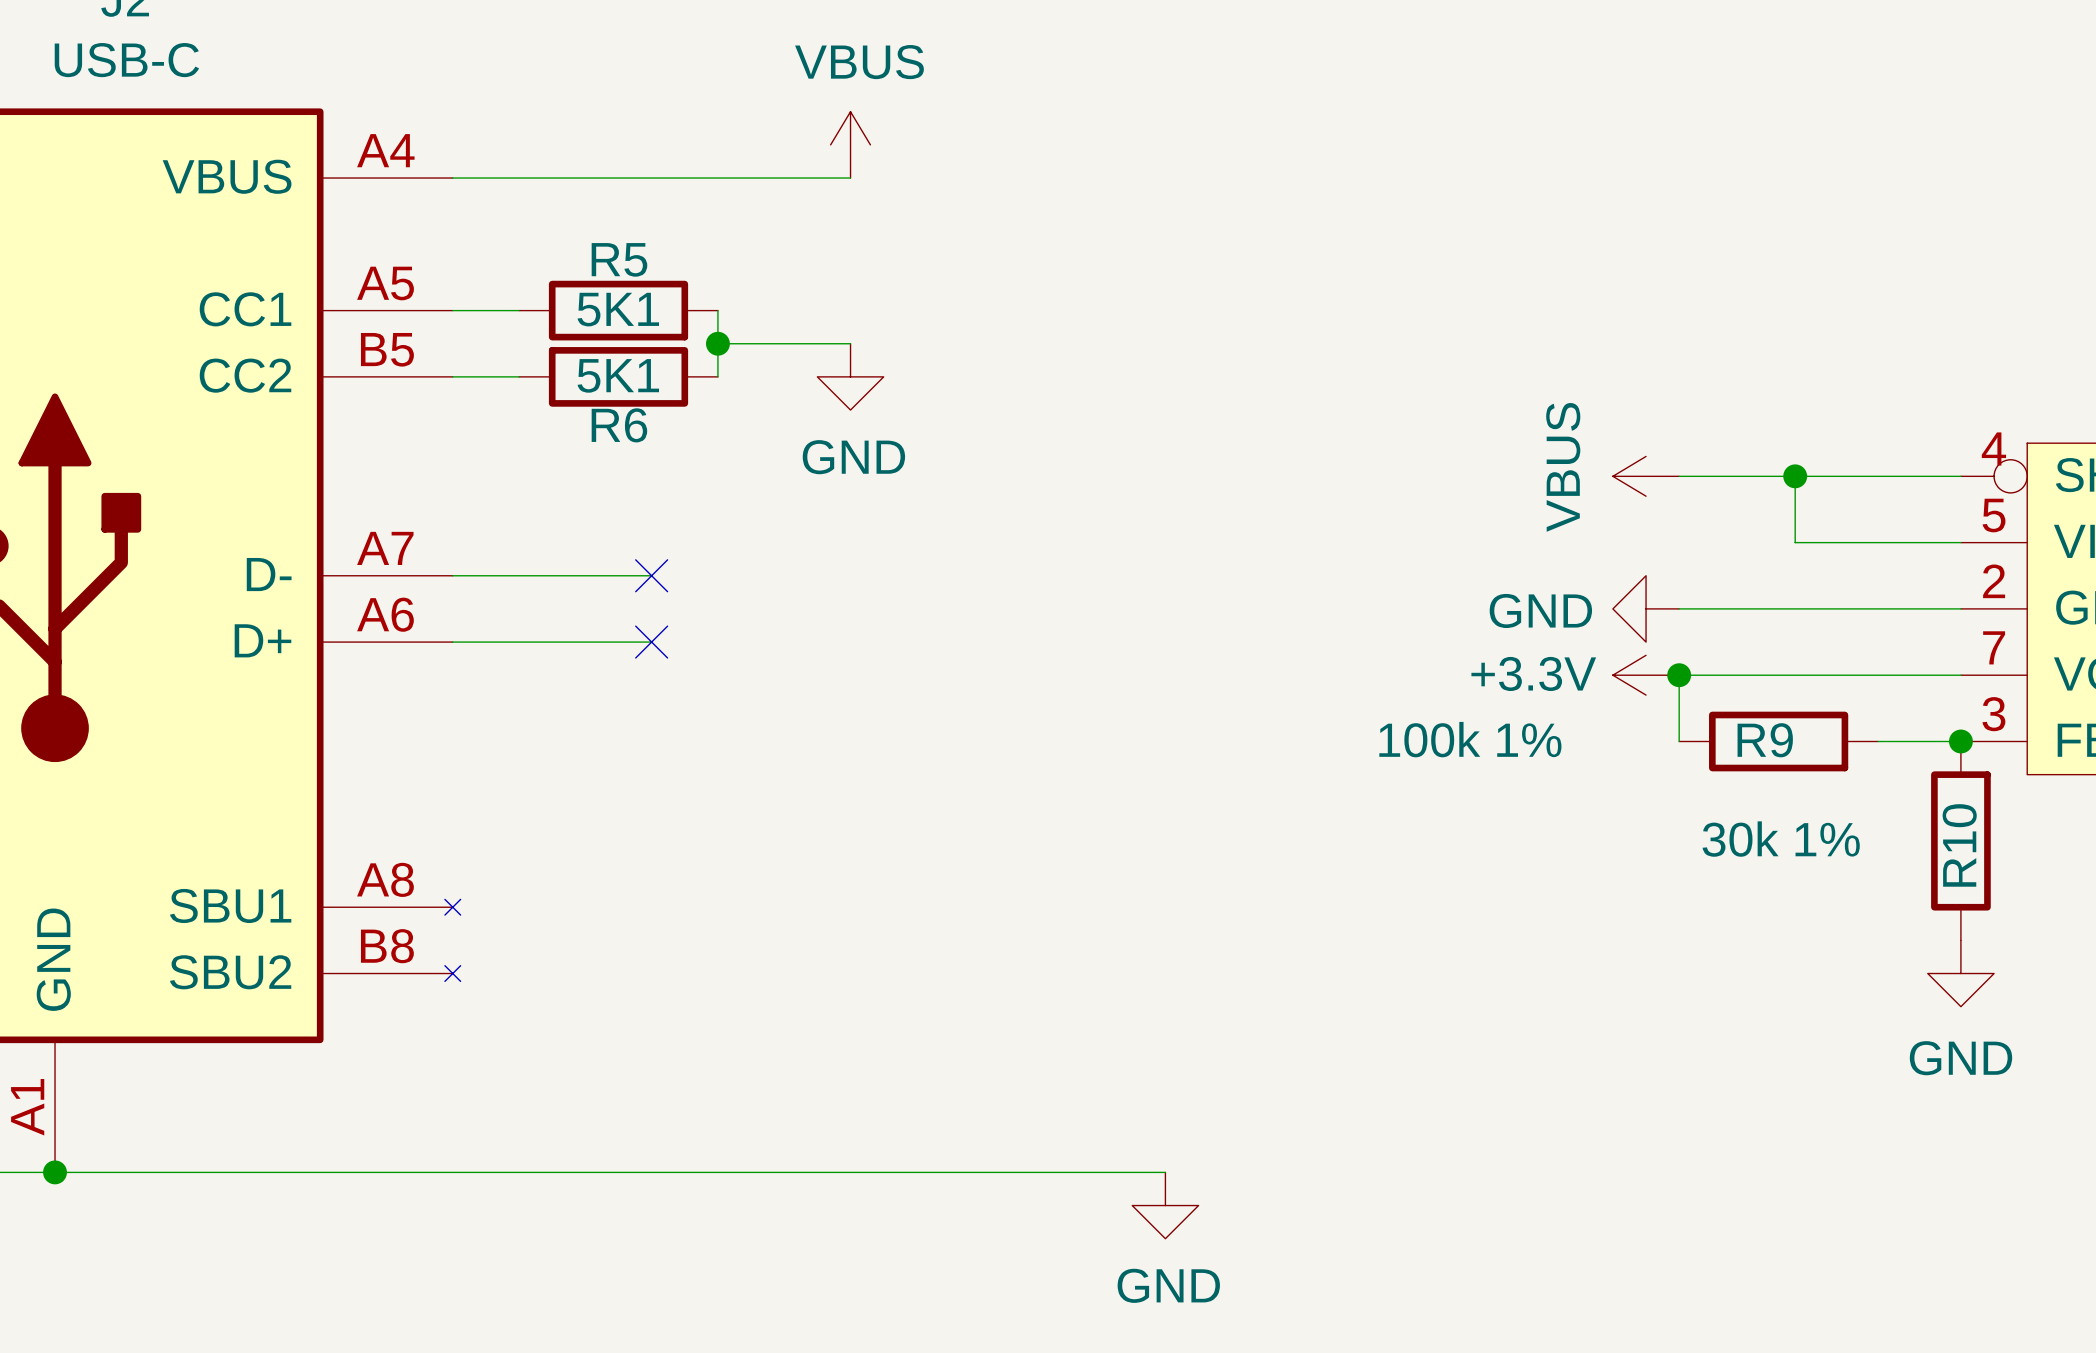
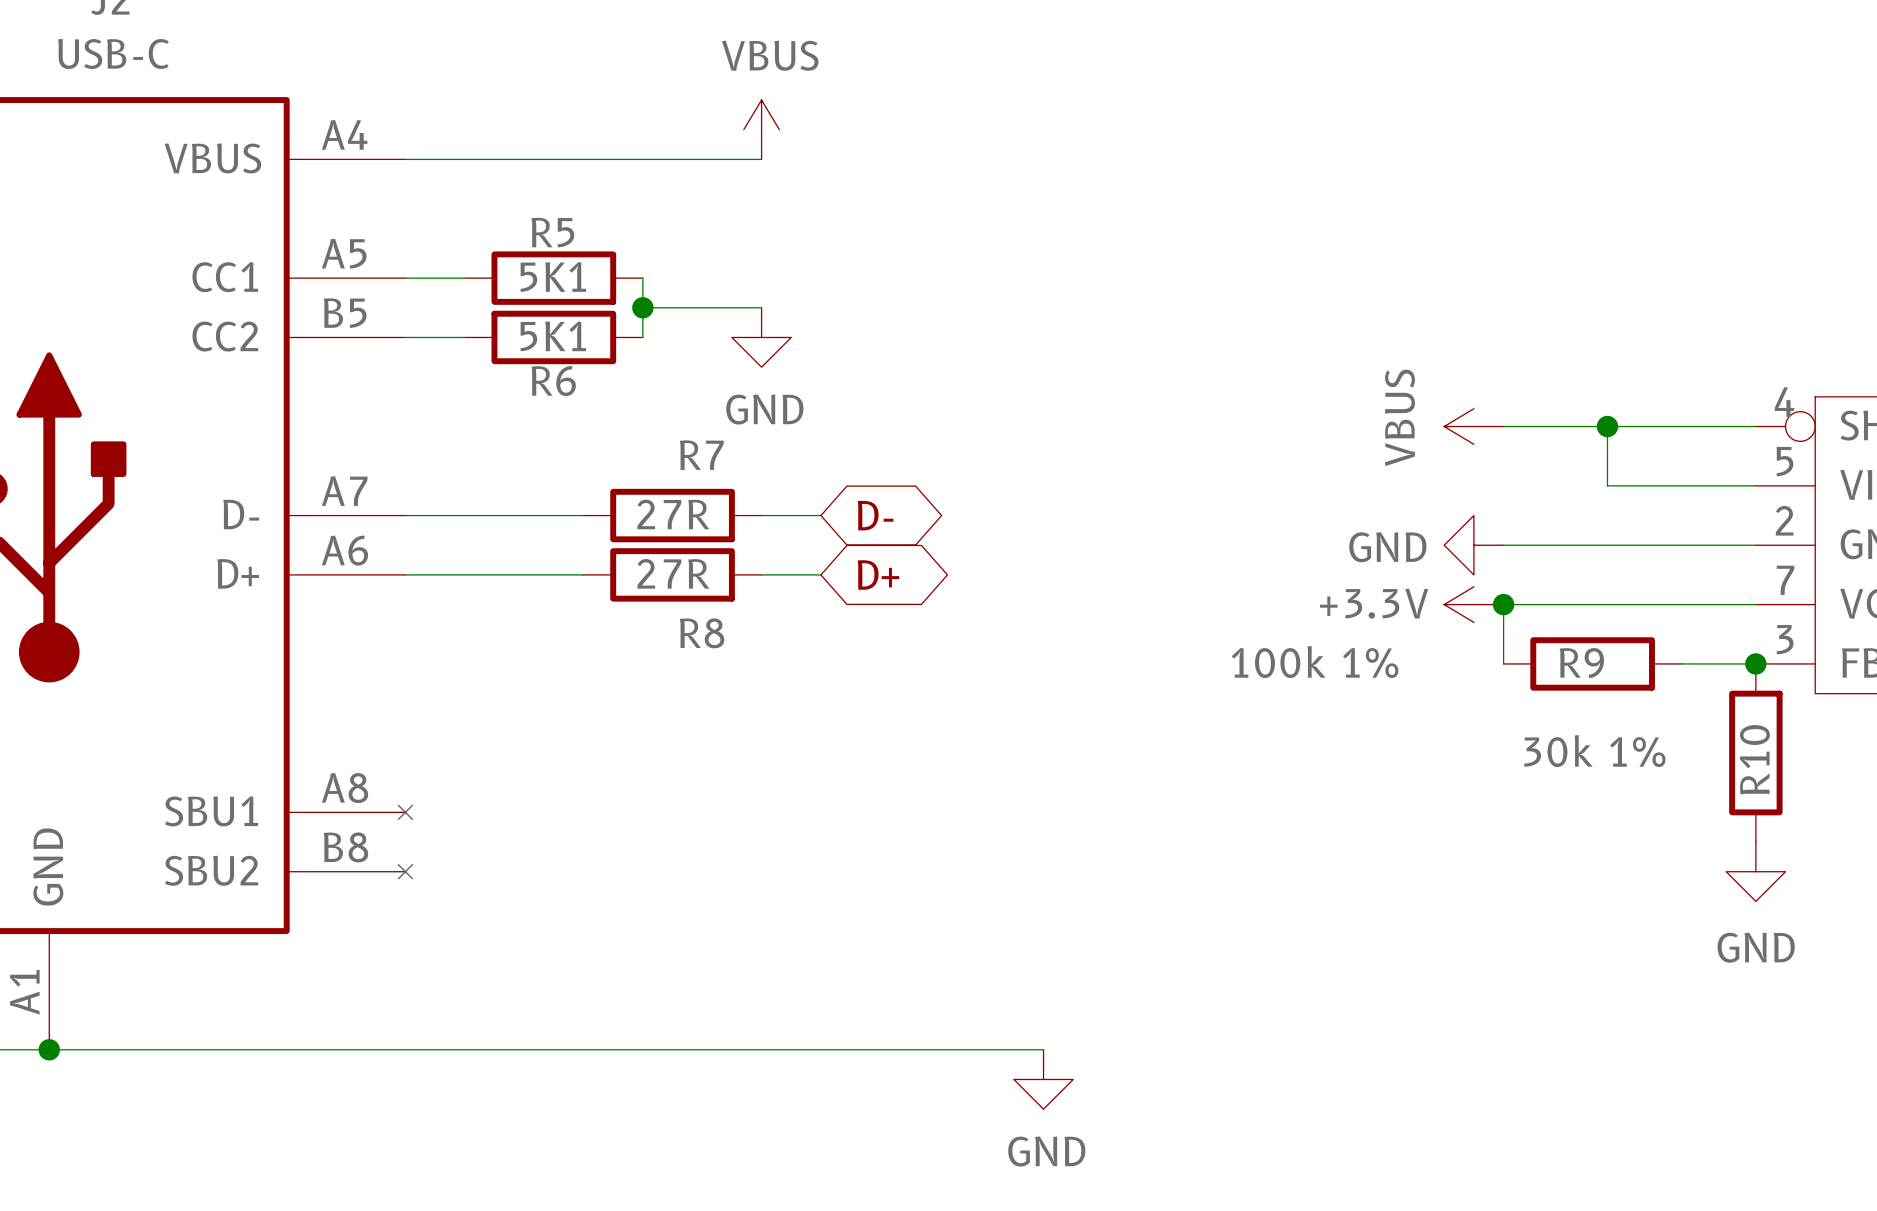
no-connect mark: (651, 575) -> none
R7: none -> 27R (672, 515)
wire: none -> (761, 515) (820, 515)
global label: none -> D- (875, 515)
no-connect mark: (651, 642) -> none
R8: none -> 27R (672, 574)
wire: none -> (761, 574) (820, 574)
global label: none -> D+ (878, 575)

